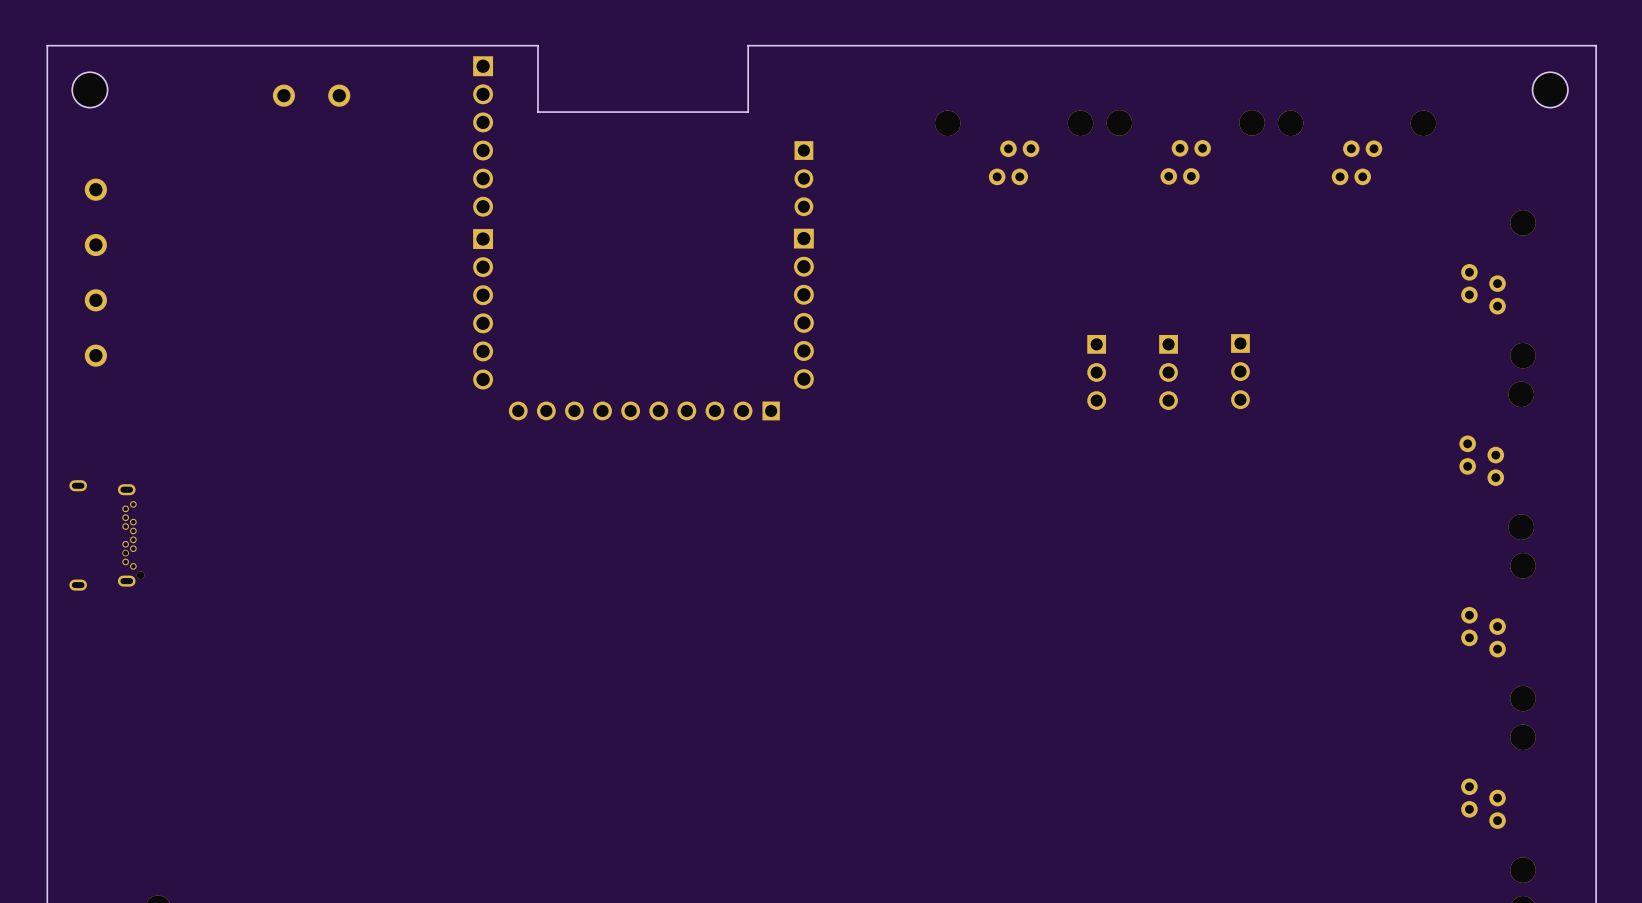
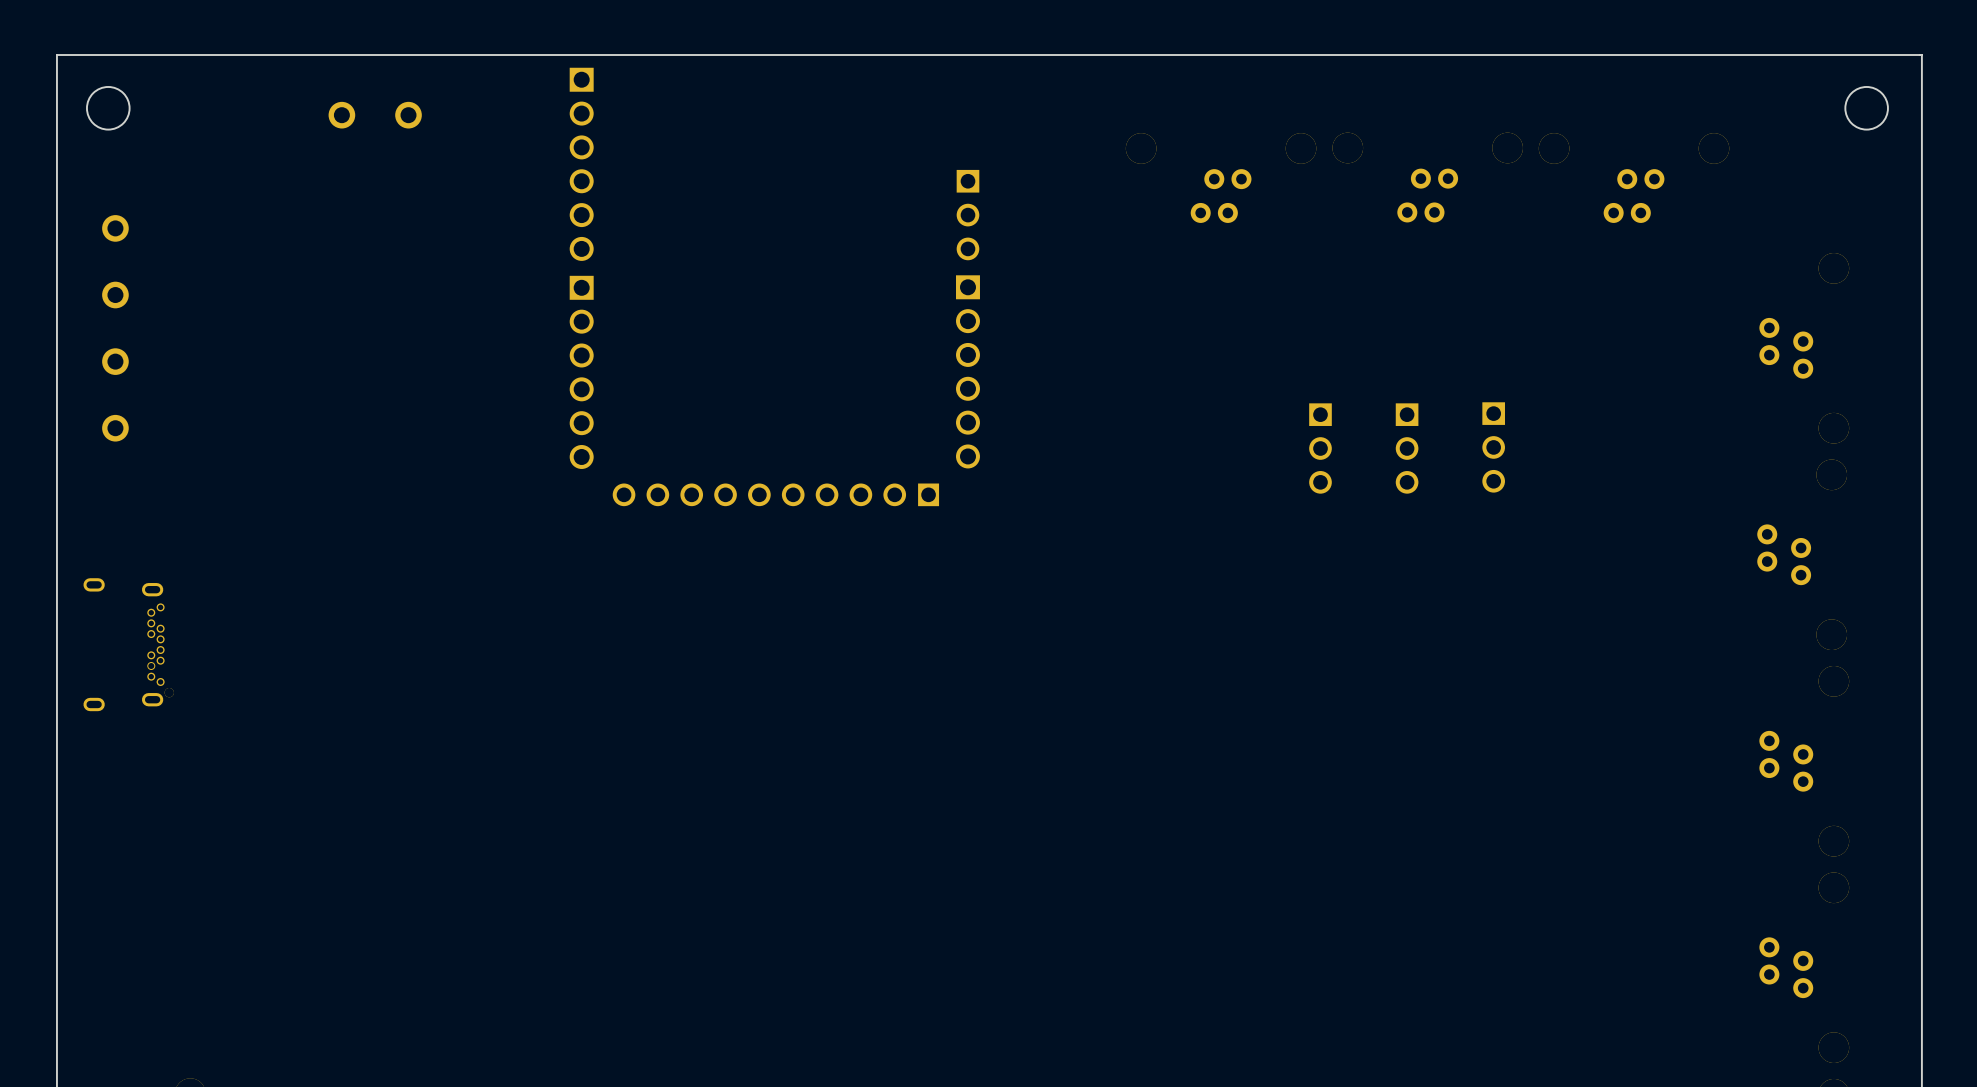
board edge: (748, 45) (748, 112) (537, 112) (537, 45) -> (900, 55) (647, 55)

